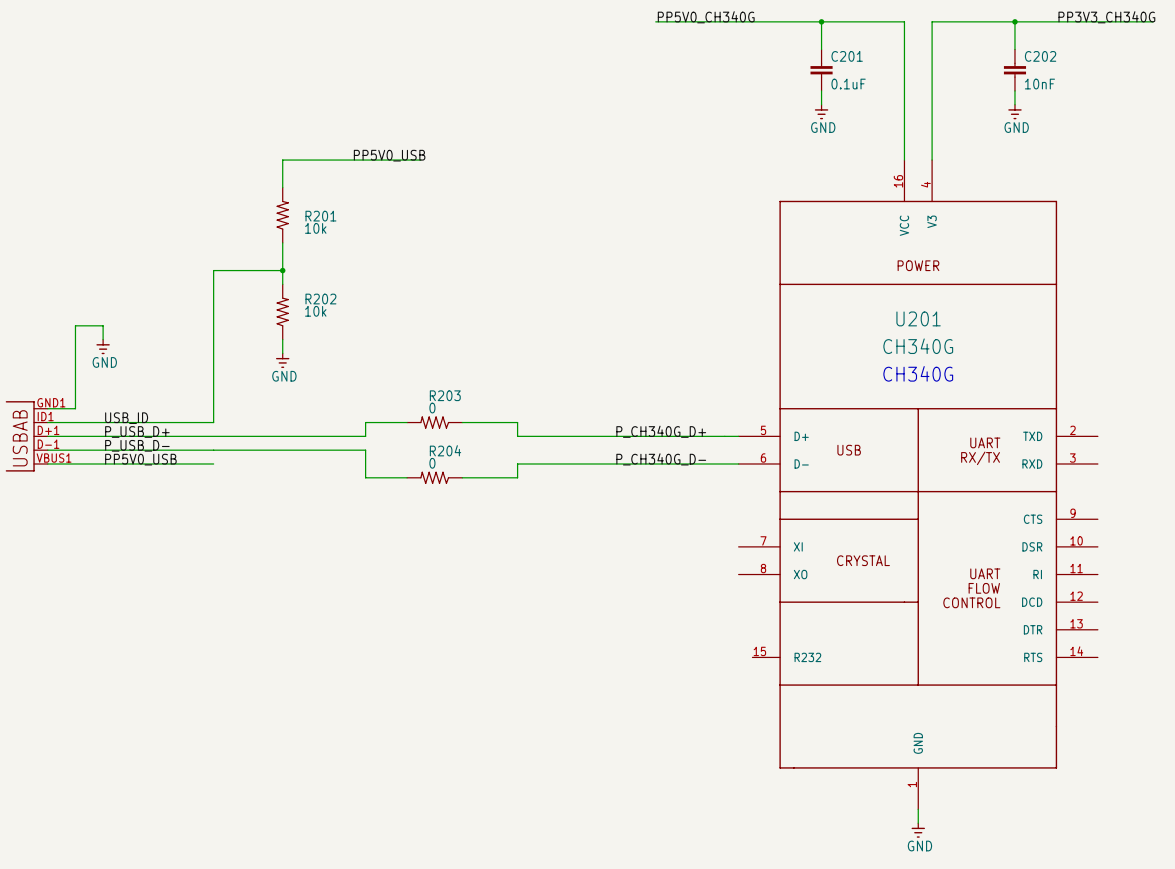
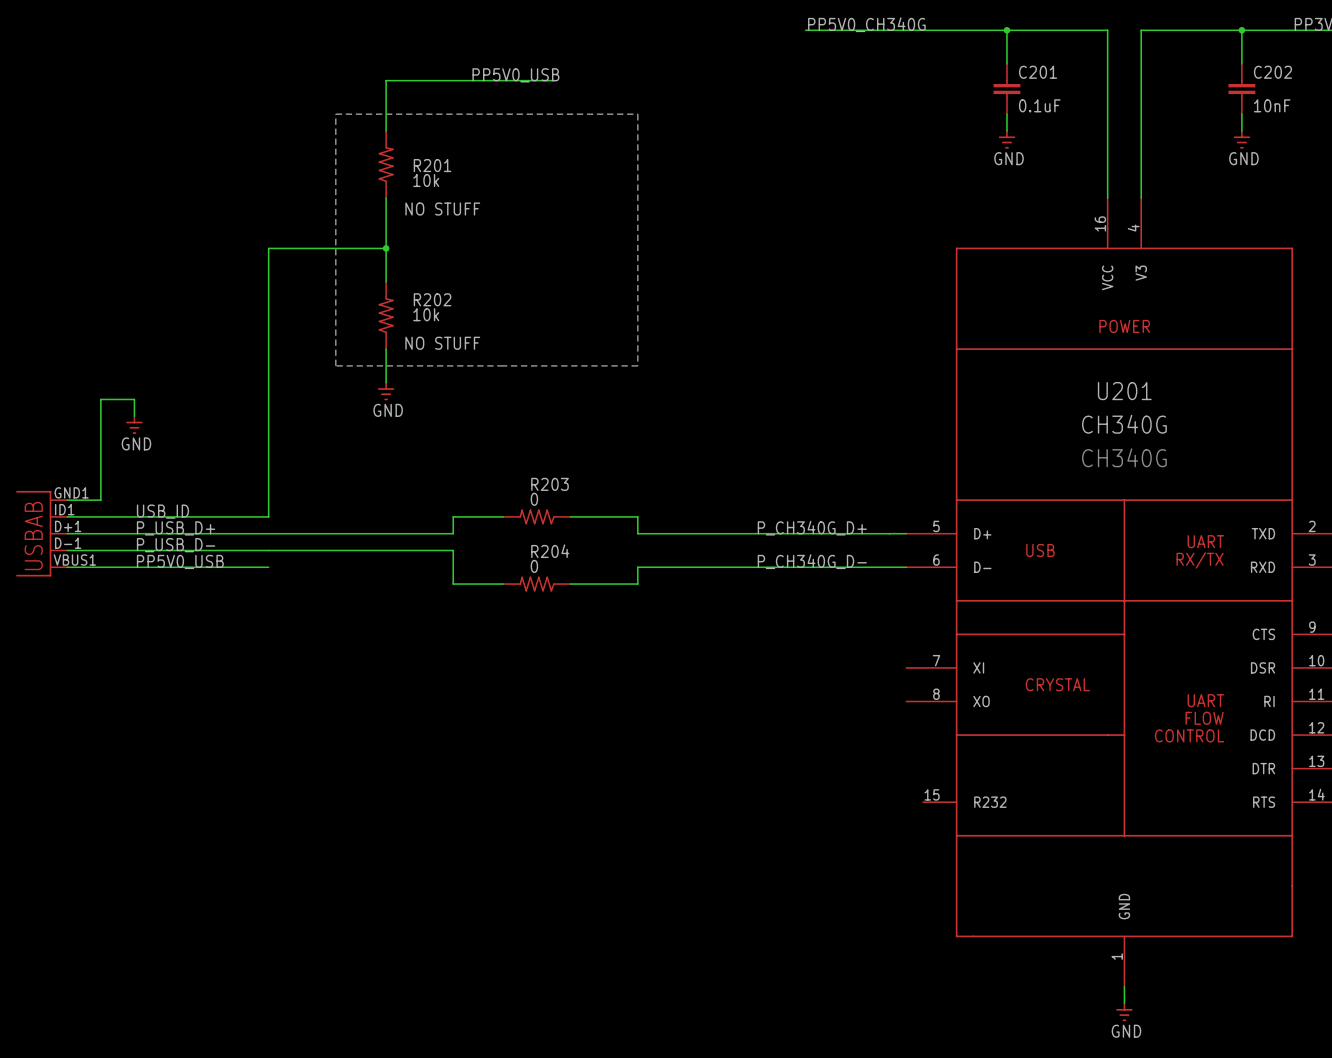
wire: none -> (553, 80) (386, 80) (386, 130)
line: none -> (335, 114) (637, 114) (637, 365) (335, 365) (335, 114)
label position: PP5V0_USB (389, 155) -> PP5V0_USB (515, 75)
wire: none -> (386, 198) (386, 282)
wire: (420, 160) (282, 160) (282, 187) -> none
R201 text: none -> NO STUFF (442, 209)
junction: none -> (386, 248)
R201 position: (282, 215) -> (386, 164)
wire: (282, 242) (282, 284) -> none
wire: (213, 270) (282, 270) -> (268, 332) (268, 248) (386, 248)
junction: (282, 270) -> none
R202 text: none -> NO STUFF (442, 343)
wire: none -> (386, 349) (386, 382)
R202 position: (282, 312) -> (386, 315)
wire: (282, 339) (282, 353) -> none
power symbol position: GND (282, 360) -> GND (386, 391)

